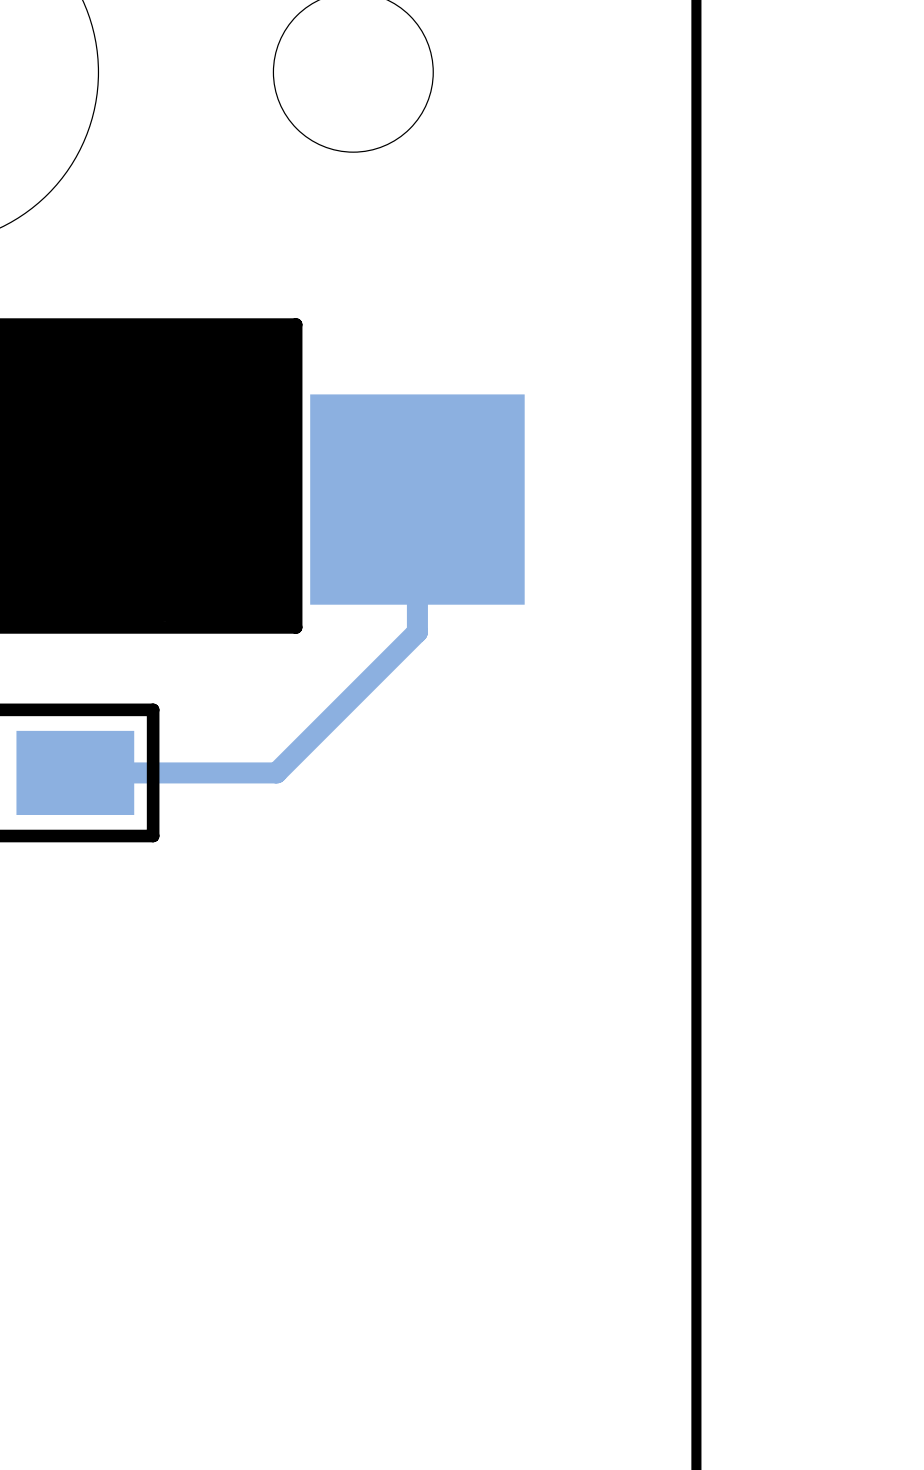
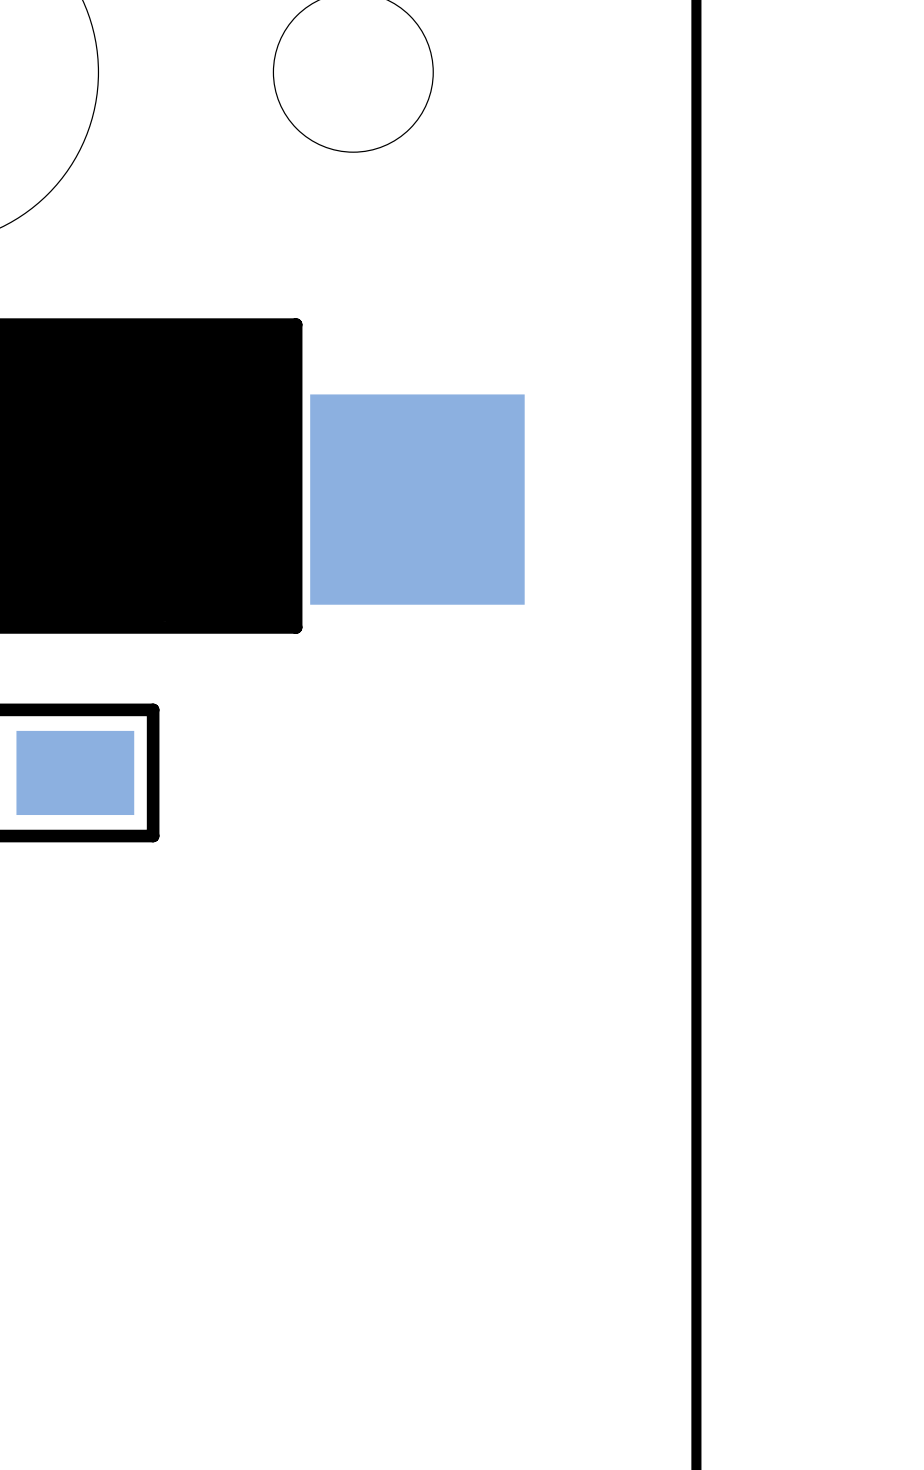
track: (417, 499) (417, 632) (276, 772) (75, 772) -> none

